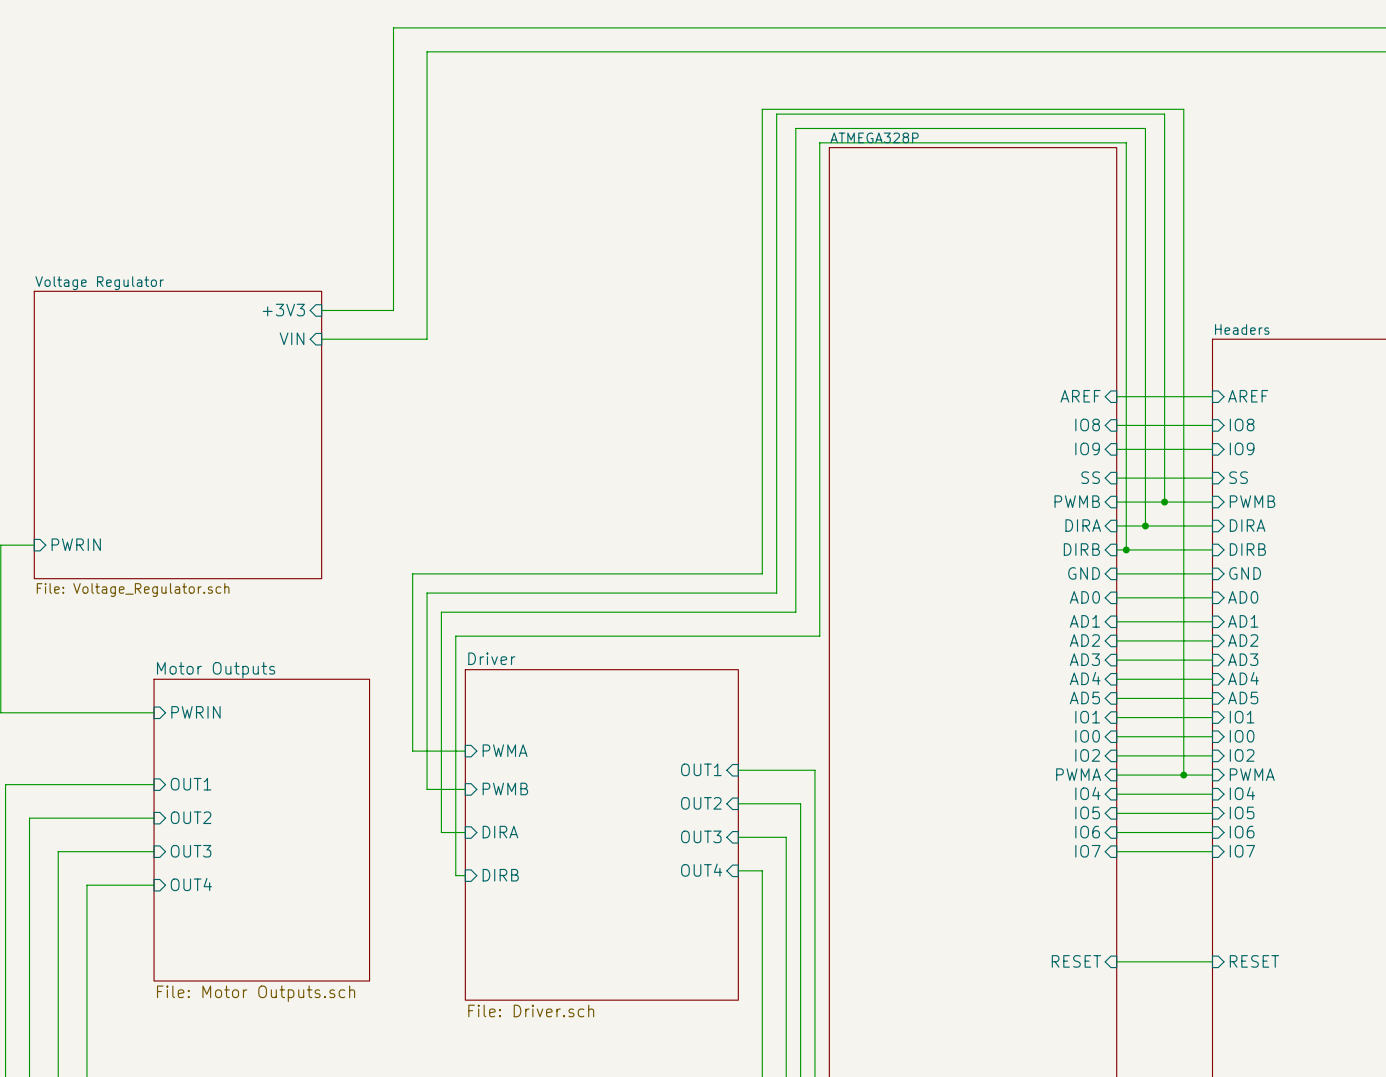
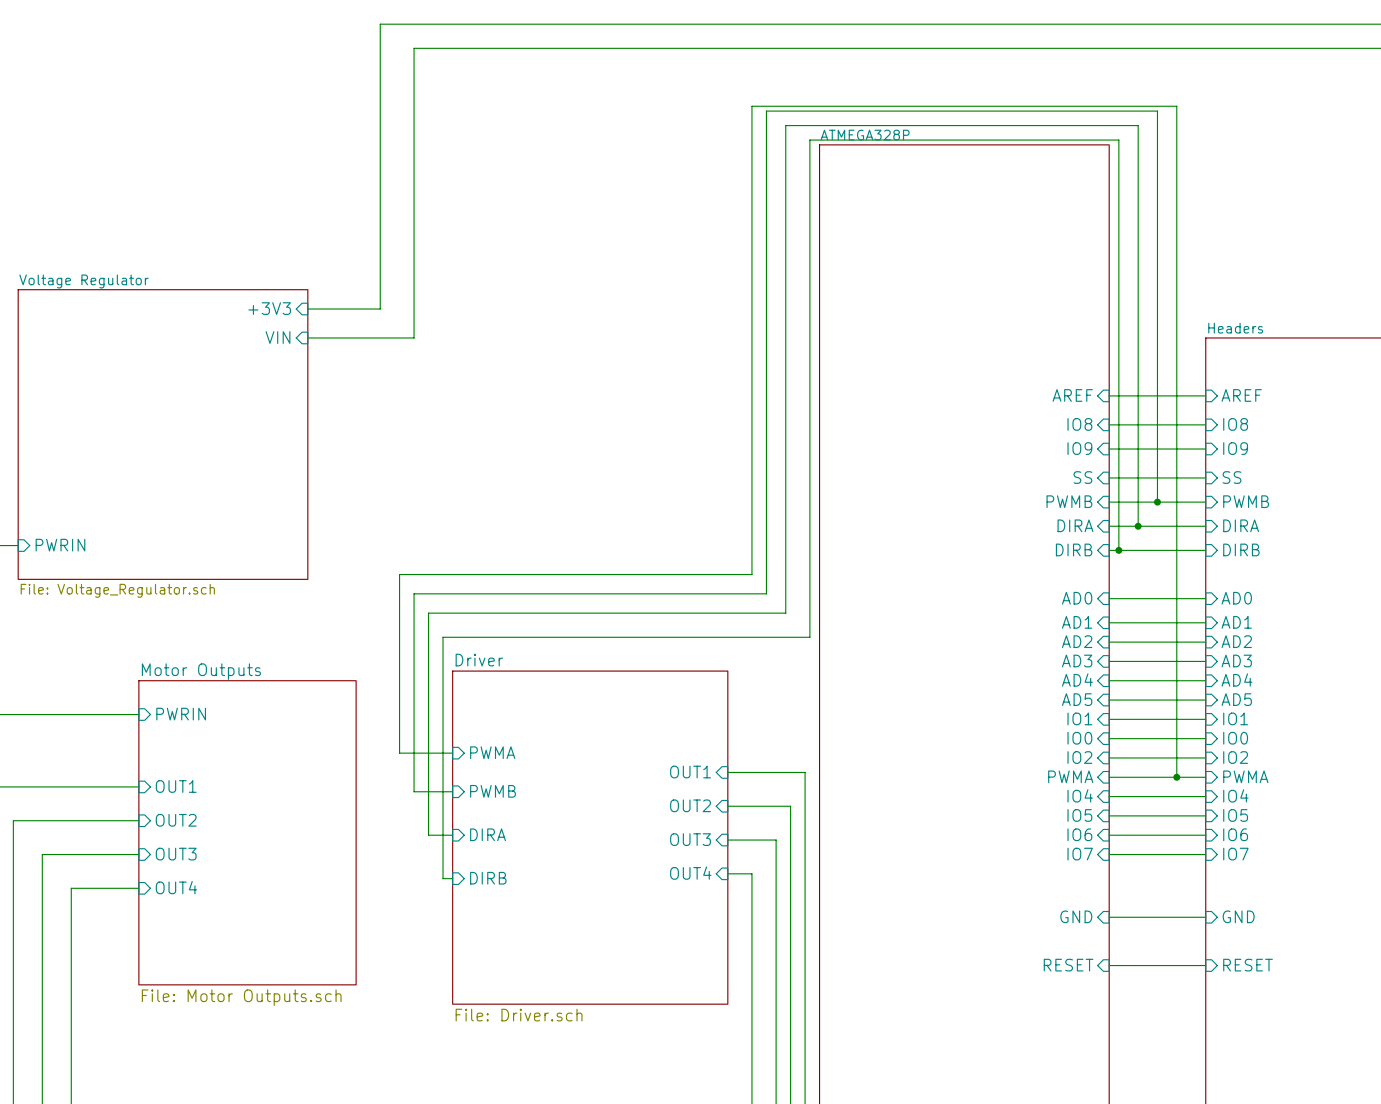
sheet pin: GND (1084, 573) -> none
wire: (1116, 573) (1212, 573) -> none
sheet pin: GND (1245, 573) -> none
sheet pin: none -> GND (1076, 916)
wire: none -> (1109, 917) (1205, 917)
sheet pin: none -> GND (1238, 916)

